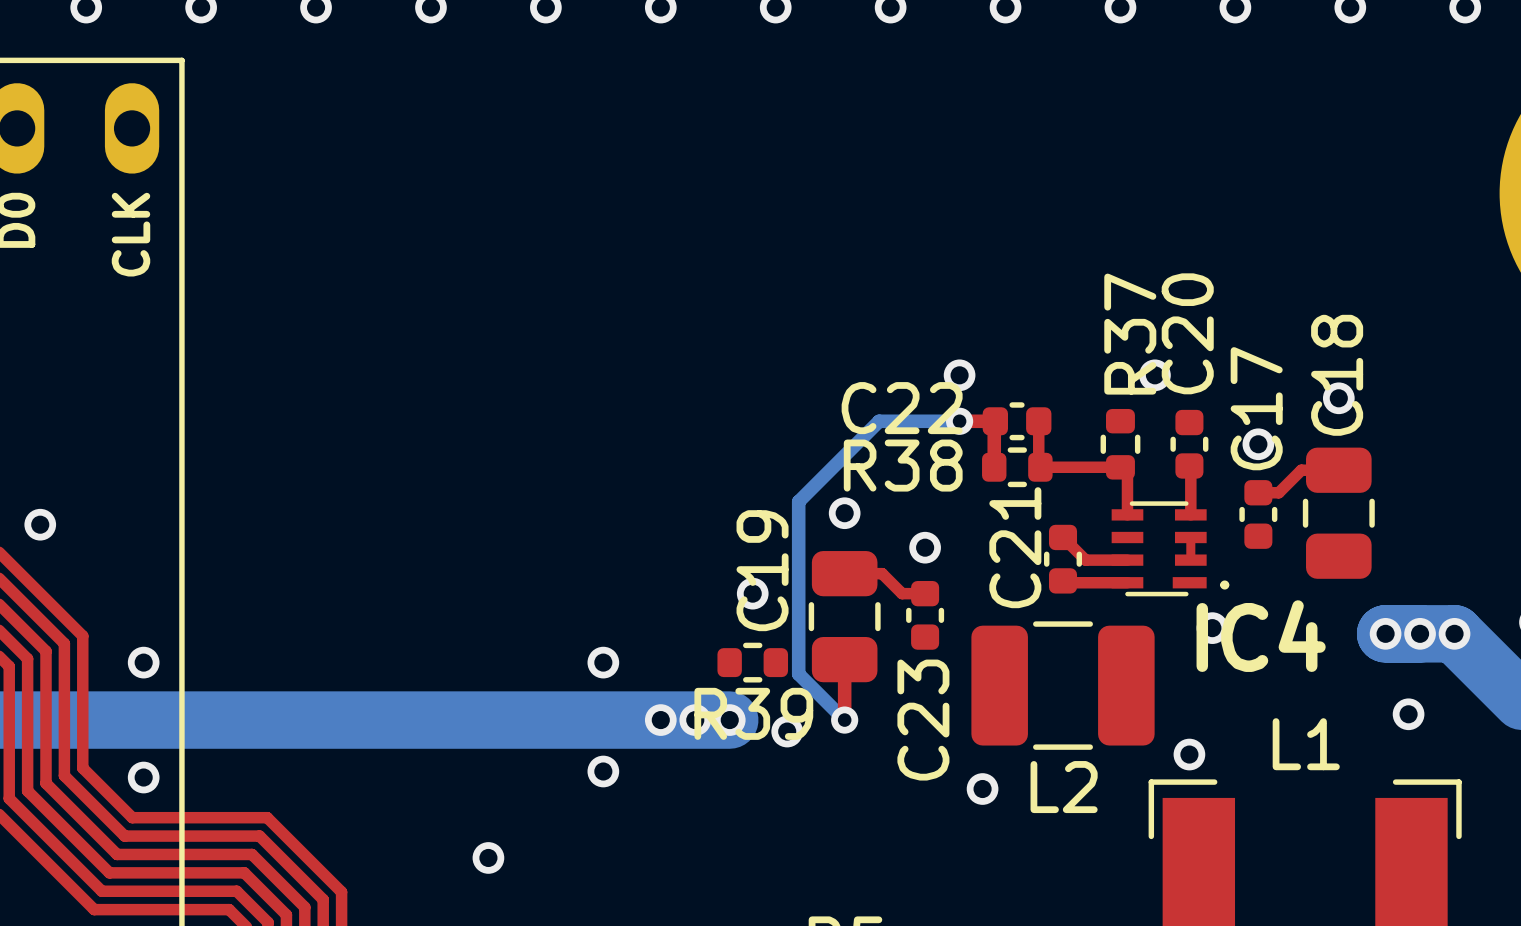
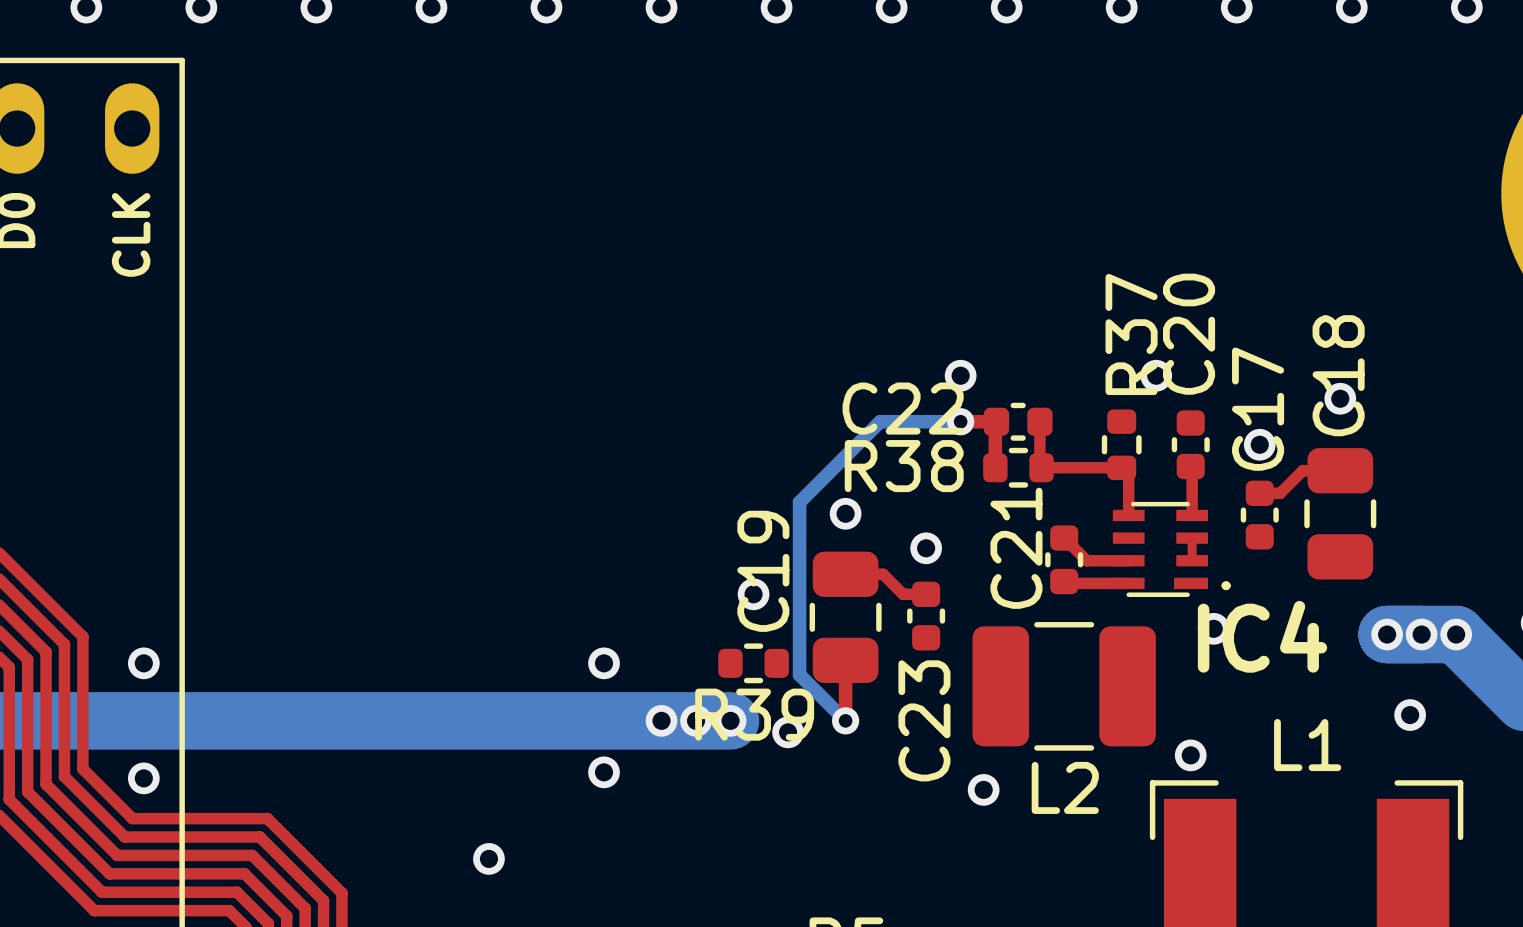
via: (40, 524) -> none

